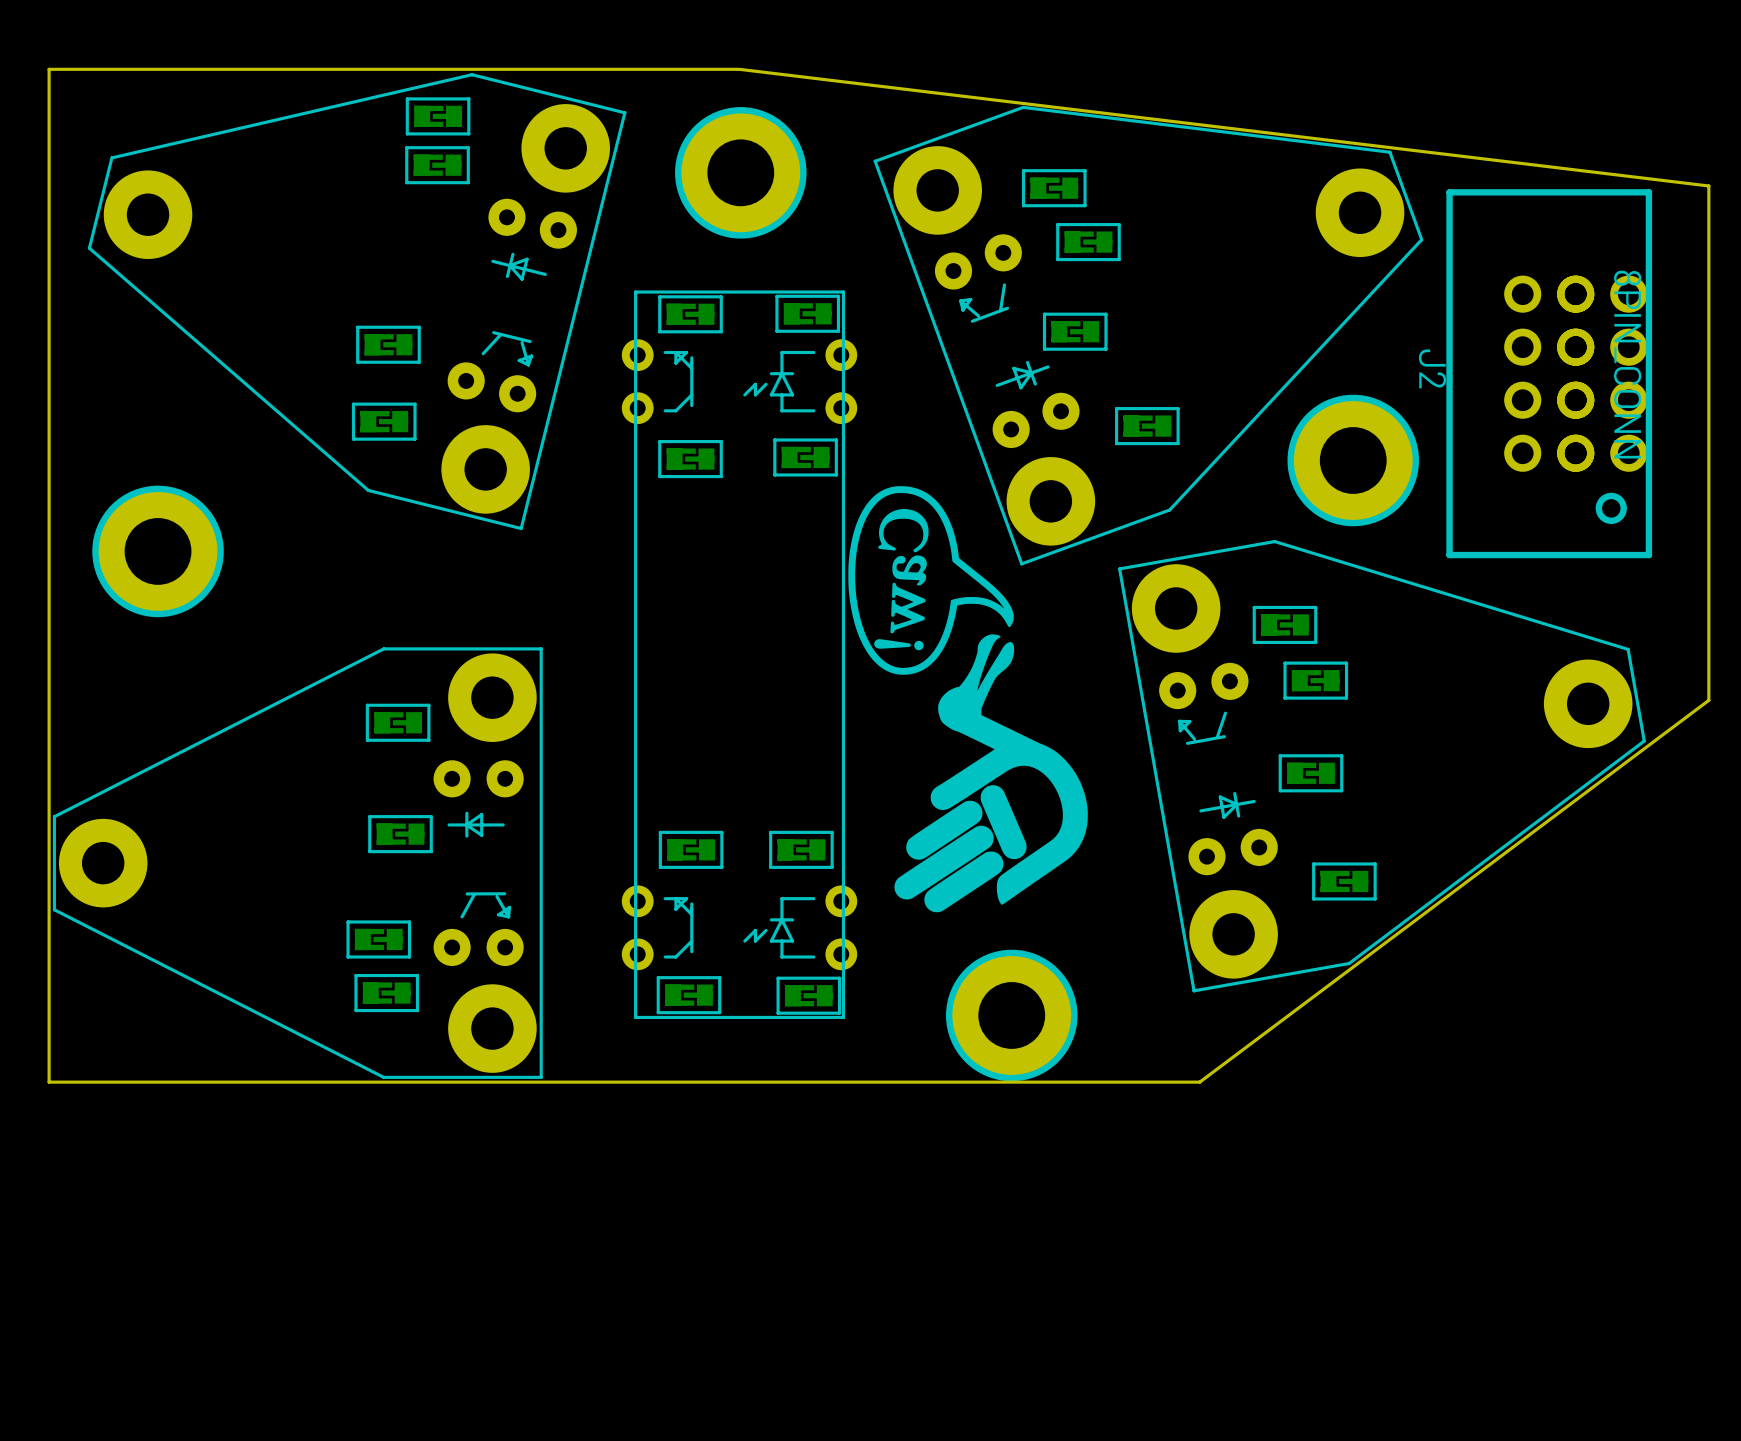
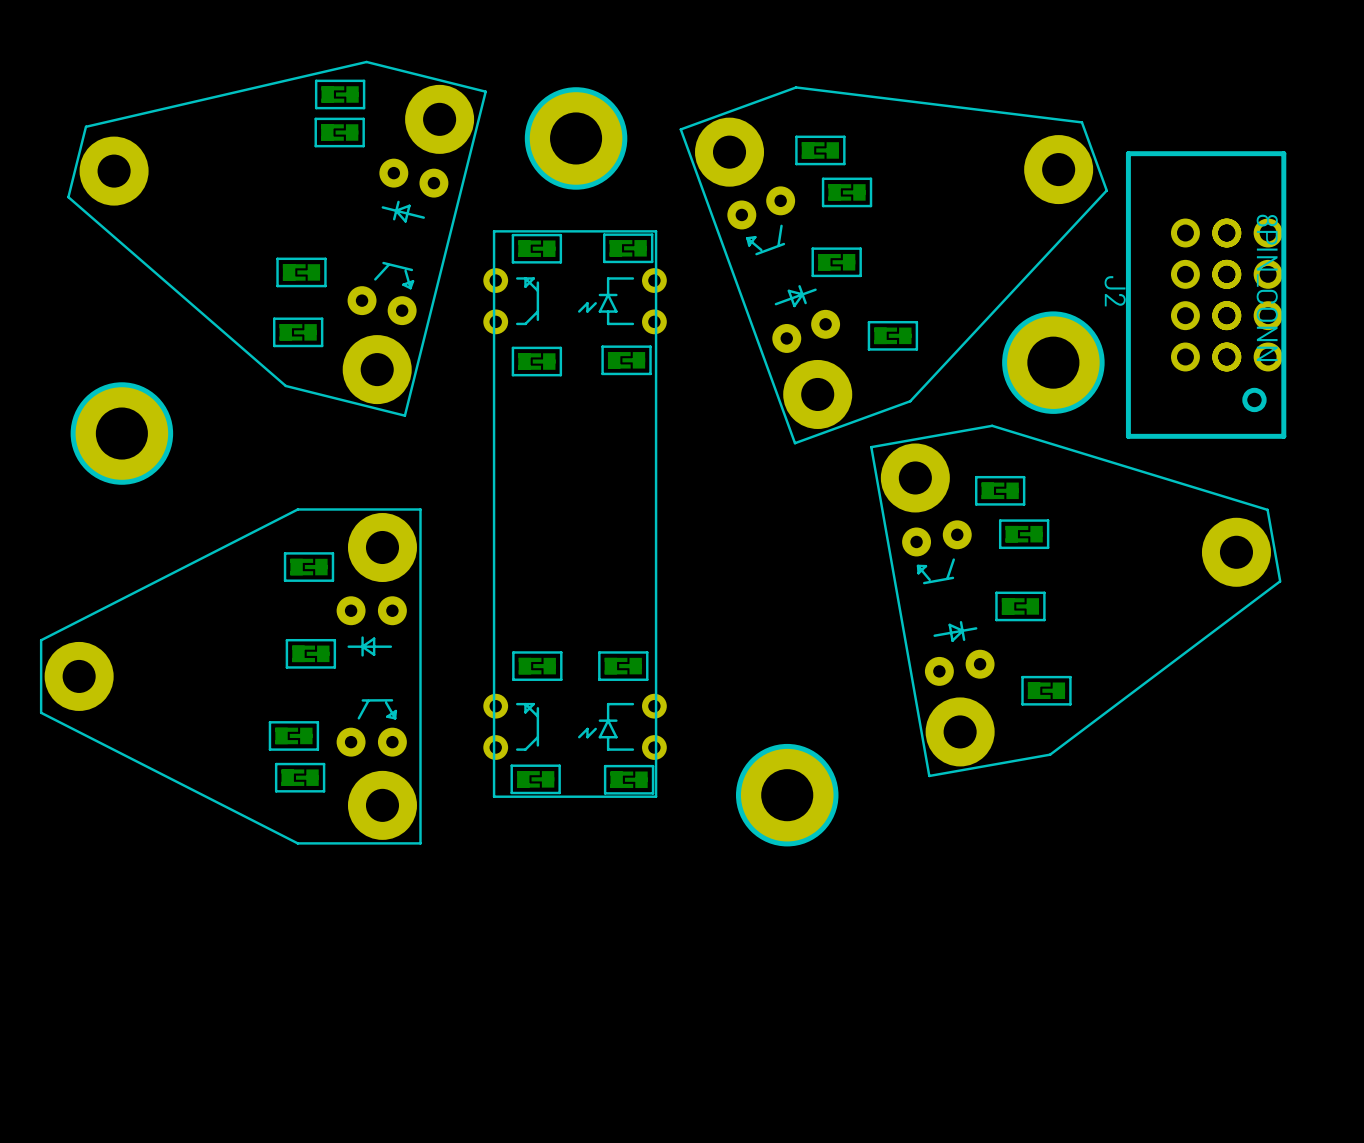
board edge: (739, 69) (1708, 185) (1708, 700) (1199, 1082) (49, 1082) (49, 69) (738, 69) -> none
drawing: [848, 486, 1088, 913] -> none

